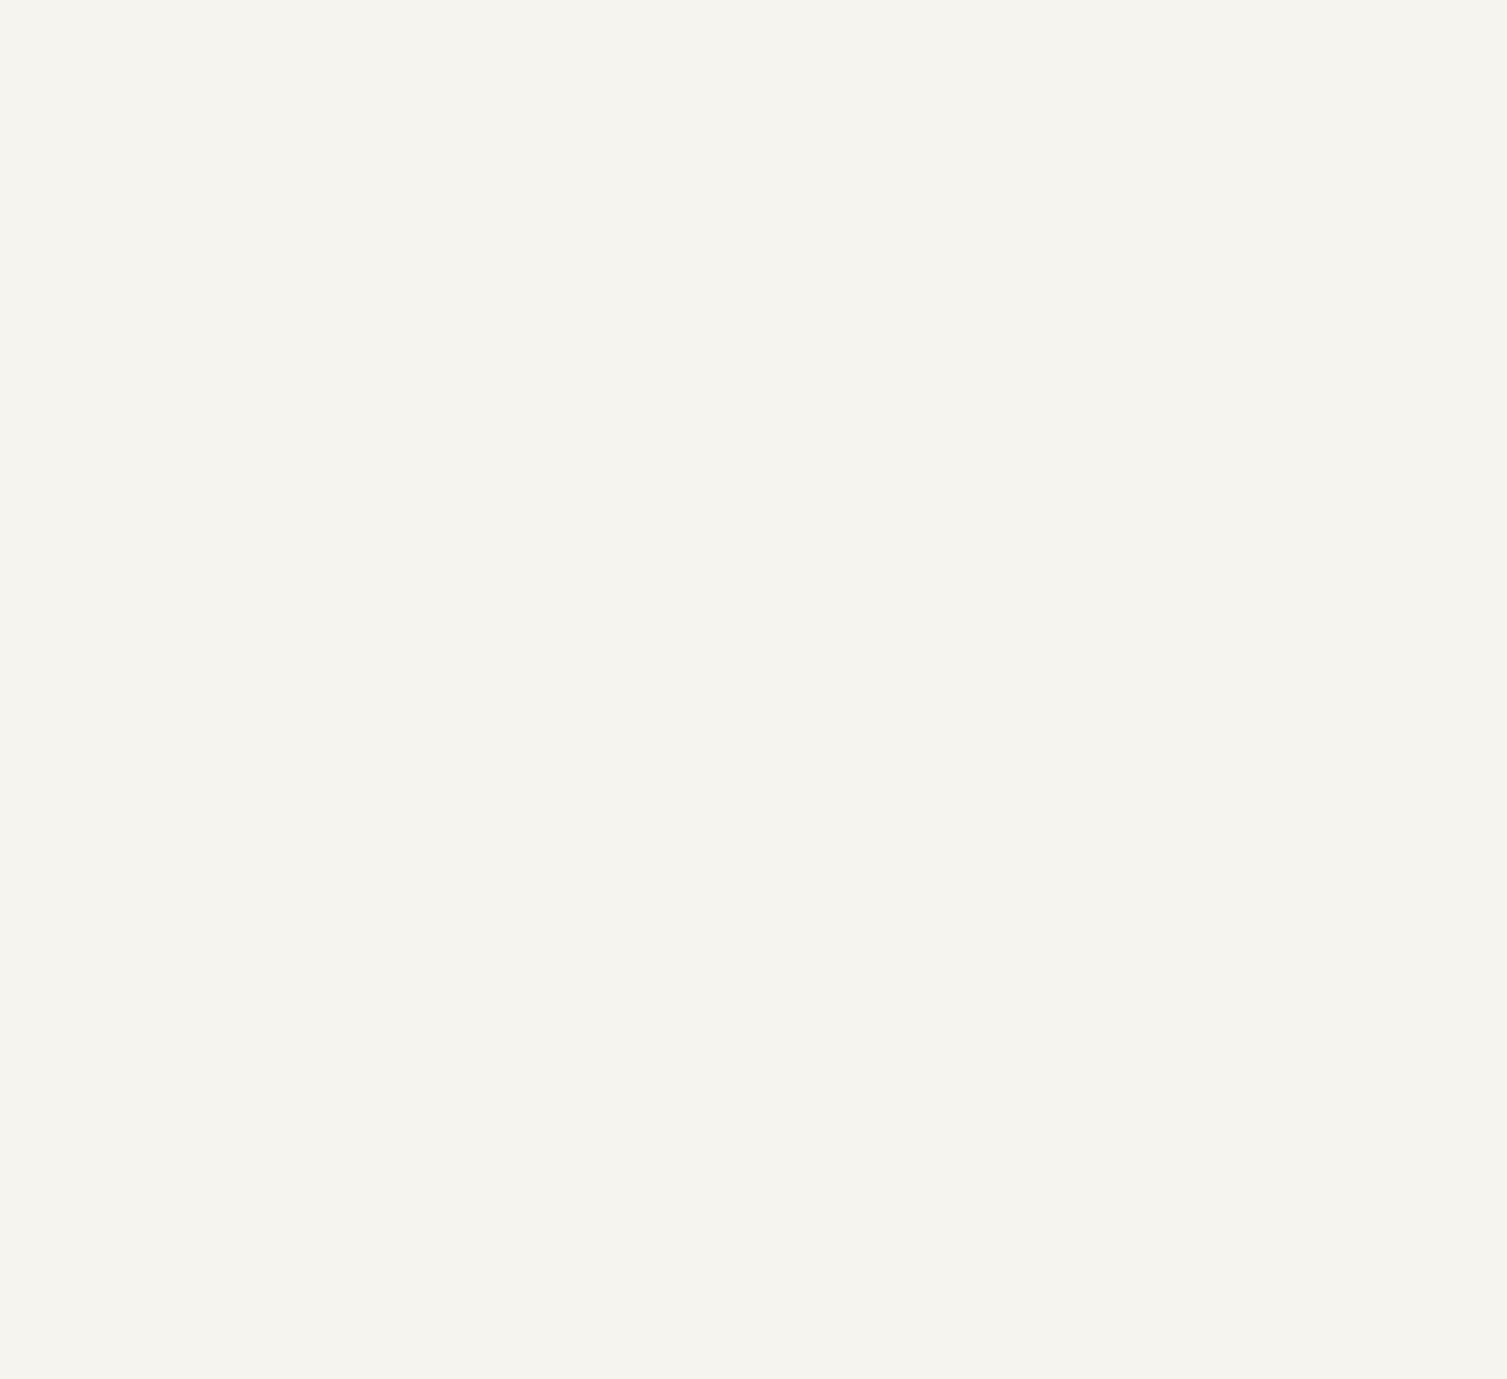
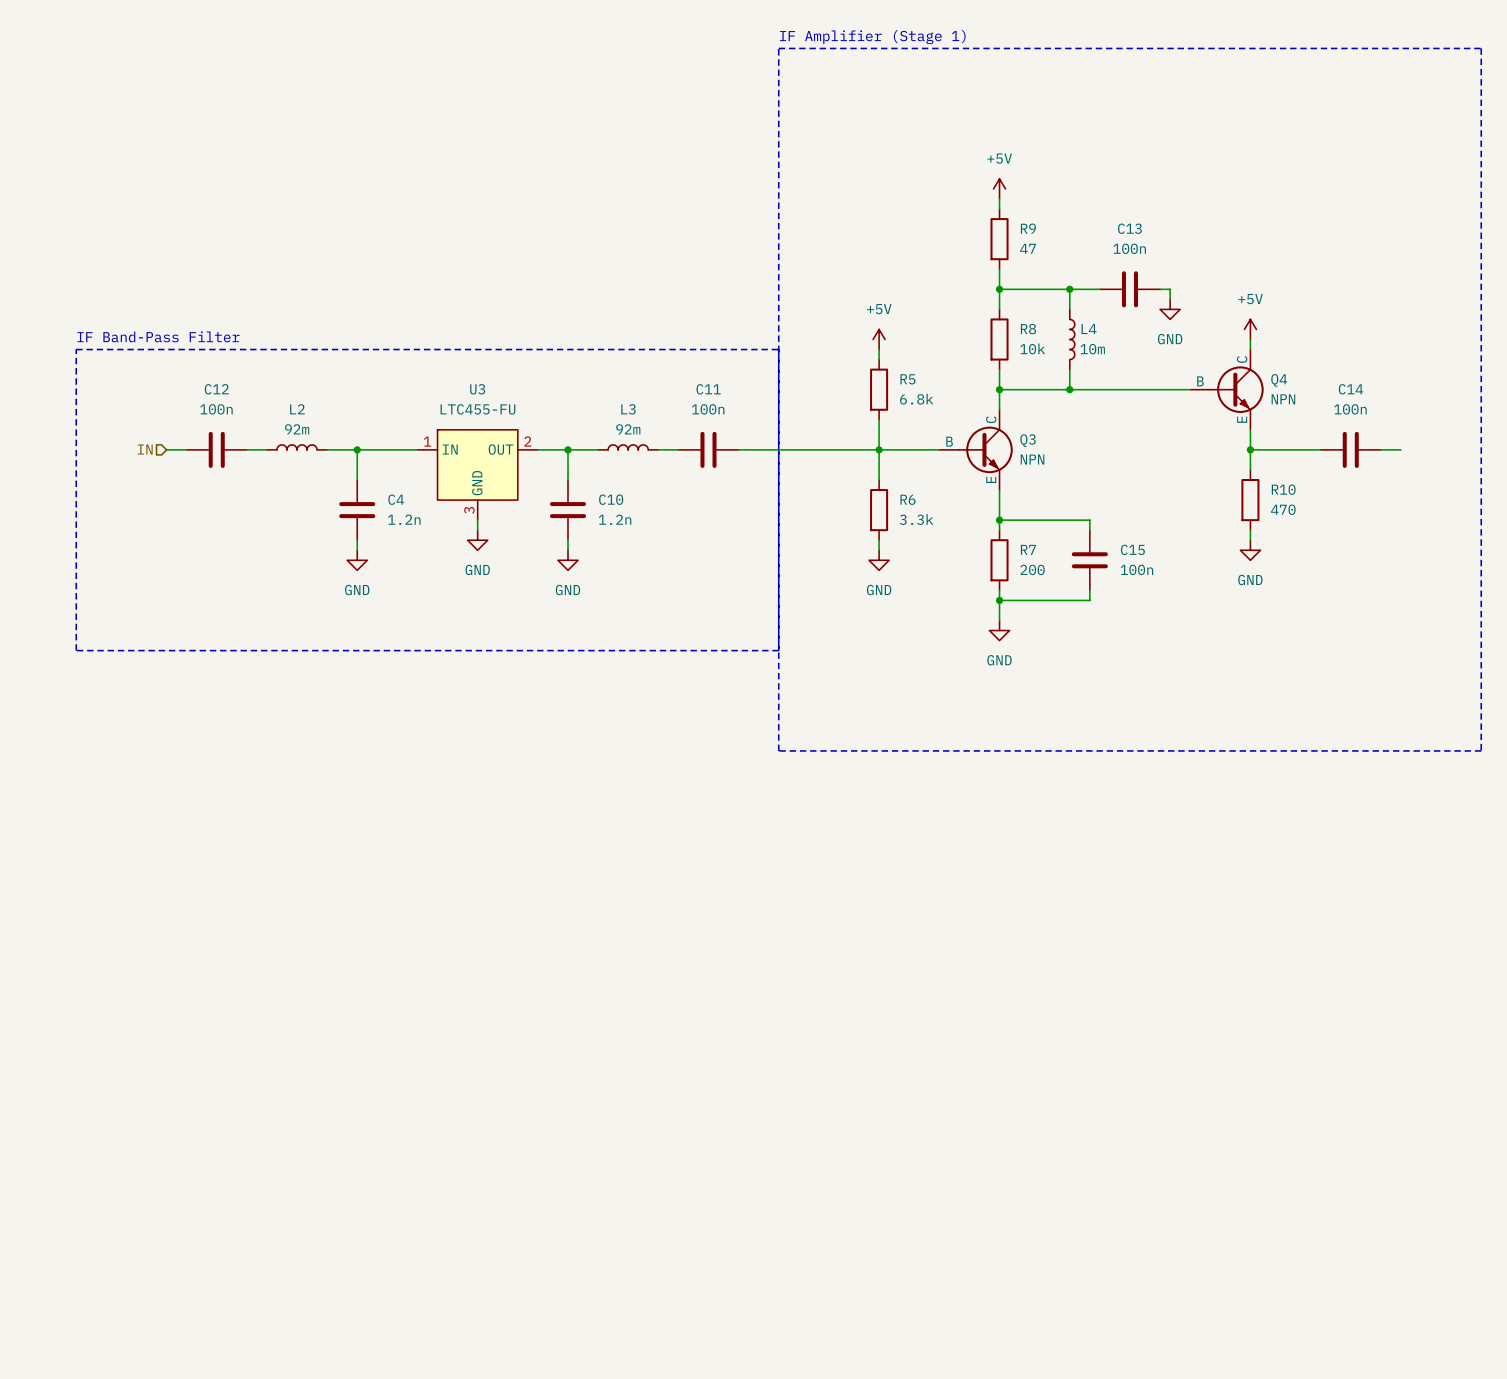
text: none -> IF Amplifier (Stage 1) (872, 37)
line: none -> (778, 48) (778, 750) (1481, 750) (1481, 48) (778, 48)
power symbol: none -> +5V (999, 188)
wire: none -> (999, 199) (999, 209)
R9: none -> 47 (999, 239)
wire: none -> (999, 269) (999, 309)
wire: none -> (999, 289) (1099, 289)
junction: none -> (999, 289)
wire: none -> (1069, 289) (1069, 309)
junction: none -> (1069, 289)
C13: none -> 100n (1129, 289)
wire: none -> (1160, 289) (1170, 289) (1170, 299)
power symbol: none -> GND (1170, 309)
power symbol: none -> +5V (1250, 329)
text: none -> IF Band-Pass Filter (158, 336)
power symbol: none -> +5V (879, 339)
R8: none -> 10k (999, 339)
L4: none -> 10m (1072, 339)
wire: none -> (1250, 339) (1250, 349)
line: none -> (778, 349) (76, 349) (76, 650) (778, 650)
wire: none -> (879, 349) (879, 359)
wire: none -> (999, 369) (999, 409)
wire: none -> (1069, 369) (1069, 389)
R5: none -> 6.8k (879, 389)
wire: none -> (999, 389) (1190, 389)
junction: none -> (999, 389)
junction: none -> (1069, 389)
Q4: none -> NPN (1226, 389)
wire: none -> (879, 419) (879, 480)
wire: none -> (1250, 429) (1250, 469)
L2: none -> 92m (297, 447)
L3: none -> 92m (628, 447)
hierarchical label: none -> IN (145, 449)
wire: none -> (166, 449) (186, 449)
C12: none -> 100n (216, 449)
wire: none -> (246, 449) (266, 449)
wire: none -> (327, 449) (417, 449)
wire: none -> (357, 449) (357, 480)
junction: none -> (357, 449)
wire: none -> (537, 449) (598, 449)
wire: none -> (567, 449) (567, 480)
junction: none -> (567, 449)
wire: none -> (658, 449) (678, 449)
C11: none -> 100n (708, 449)
wire: none -> (738, 449) (939, 449)
junction: none -> (879, 449)
Q3: none -> NPN (976, 449)
wire: none -> (1250, 449) (1320, 449)
junction: none -> (1250, 449)
C14: none -> 100n (1350, 449)
wire: none -> (1380, 449) (1400, 449)
U3: none -> LTC455-FU (477, 474)
wire: none -> (999, 490) (999, 530)
R10: none -> 470 (1250, 500)
C4: none -> 1.2n (357, 510)
C10: none -> 1.2n (567, 510)
R6: none -> 3.3k (879, 510)
wire: none -> (477, 520) (477, 530)
wire: none -> (999, 520) (1089, 520) (1089, 530)
junction: none -> (999, 520)
wire: none -> (1250, 530) (1250, 540)
wire: none -> (357, 540) (357, 550)
power symbol: none -> GND (477, 540)
wire: none -> (567, 540) (567, 550)
wire: none -> (879, 540) (879, 550)
power symbol: none -> GND (1250, 550)
power symbol: none -> GND (357, 560)
power symbol: none -> GND (567, 560)
power symbol: none -> GND (879, 560)
R7: none -> 200 (999, 560)
C15: none -> 100n (1089, 560)
wire: none -> (999, 590) (999, 620)
wire: none -> (1089, 590) (1089, 600) (999, 600)
junction: none -> (999, 600)
power symbol: none -> GND (999, 630)

